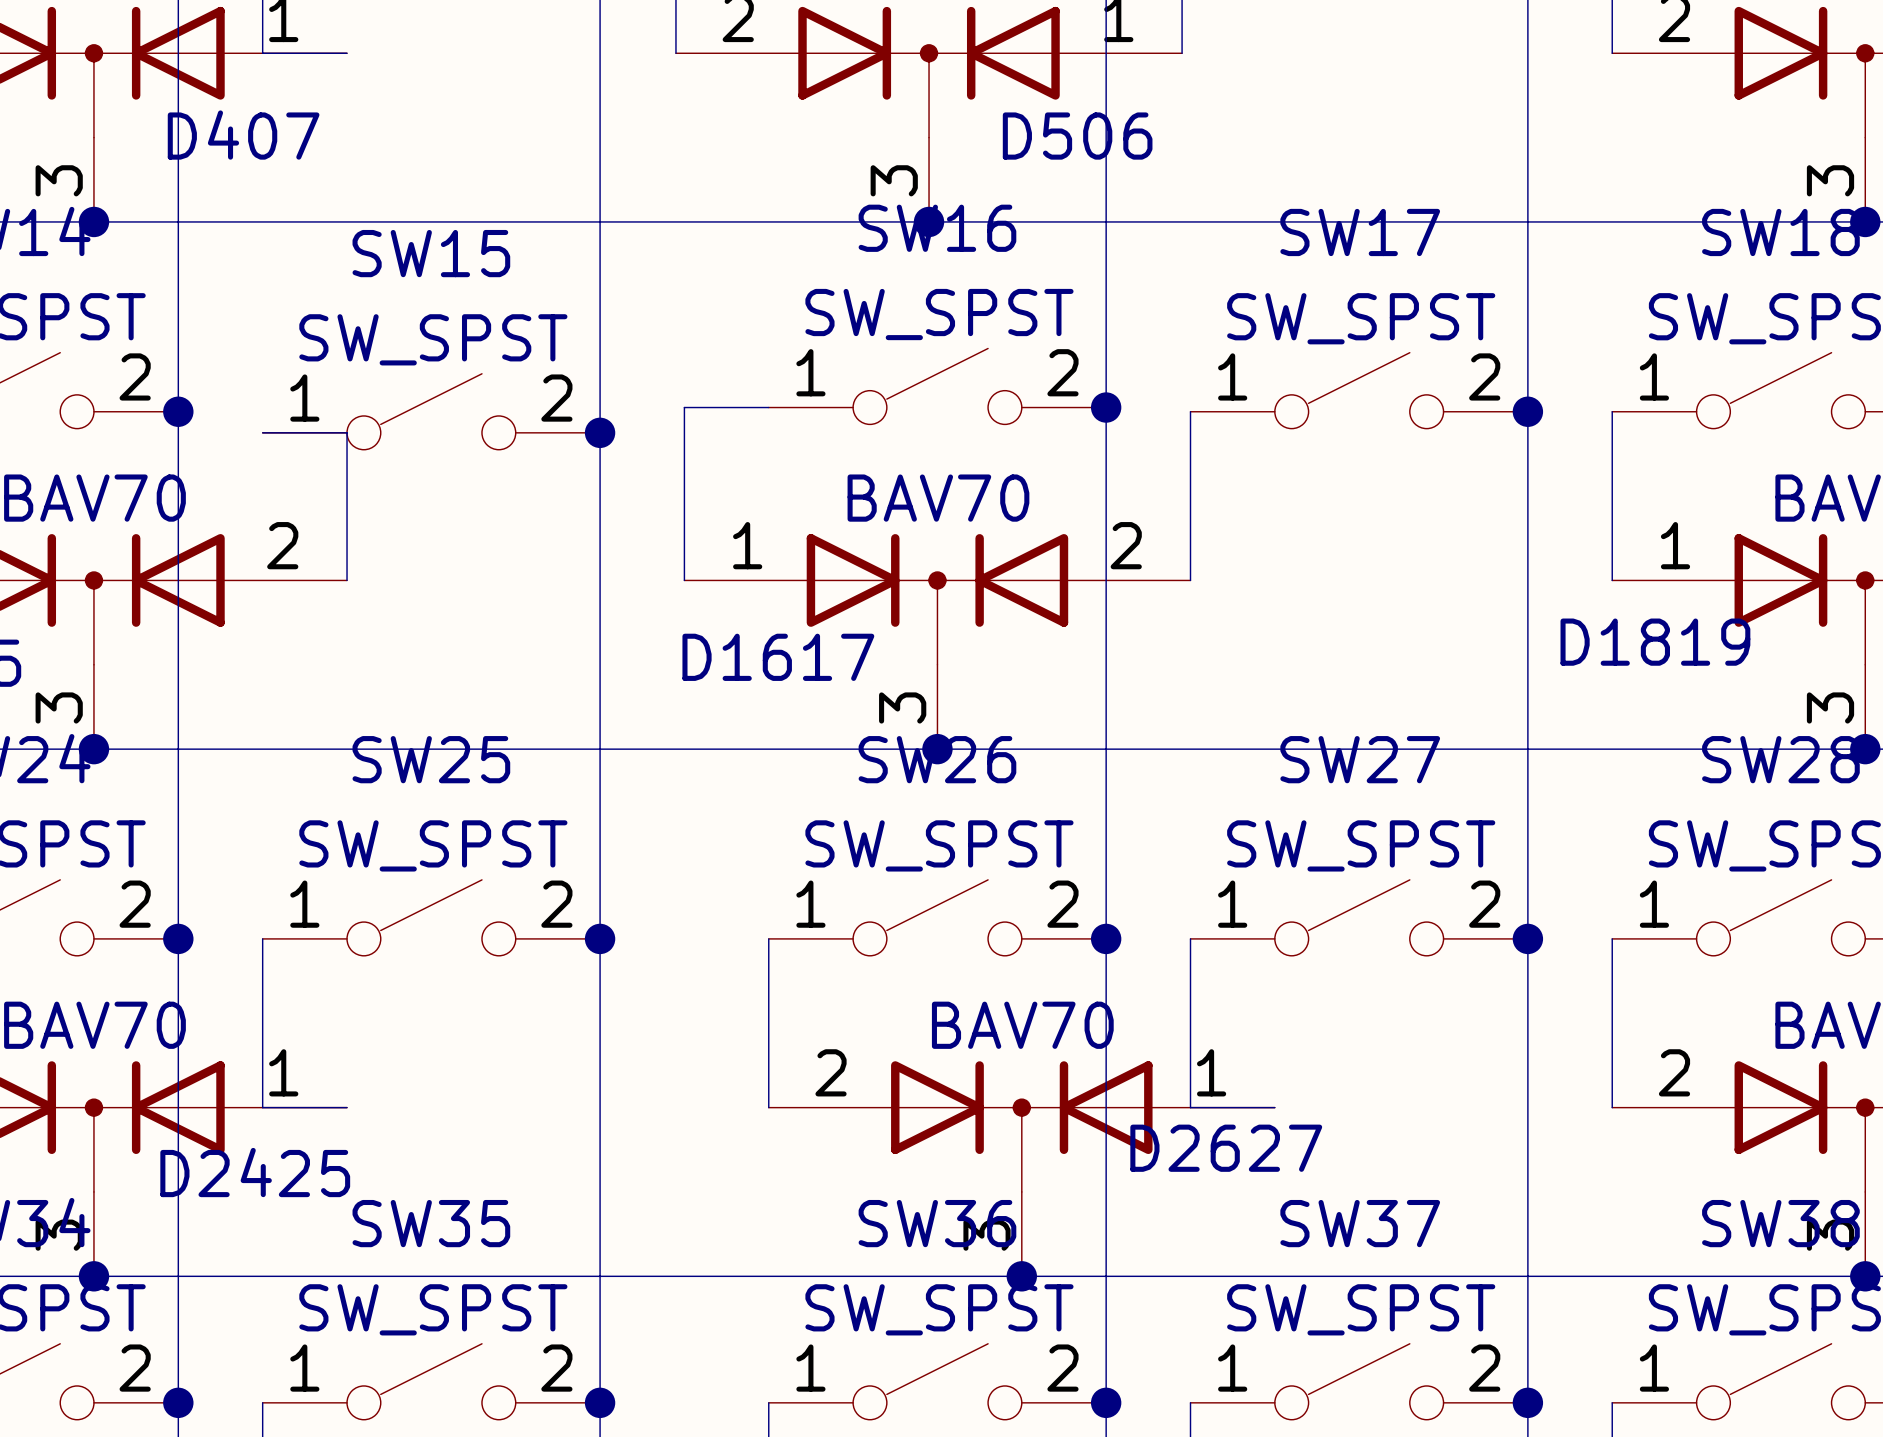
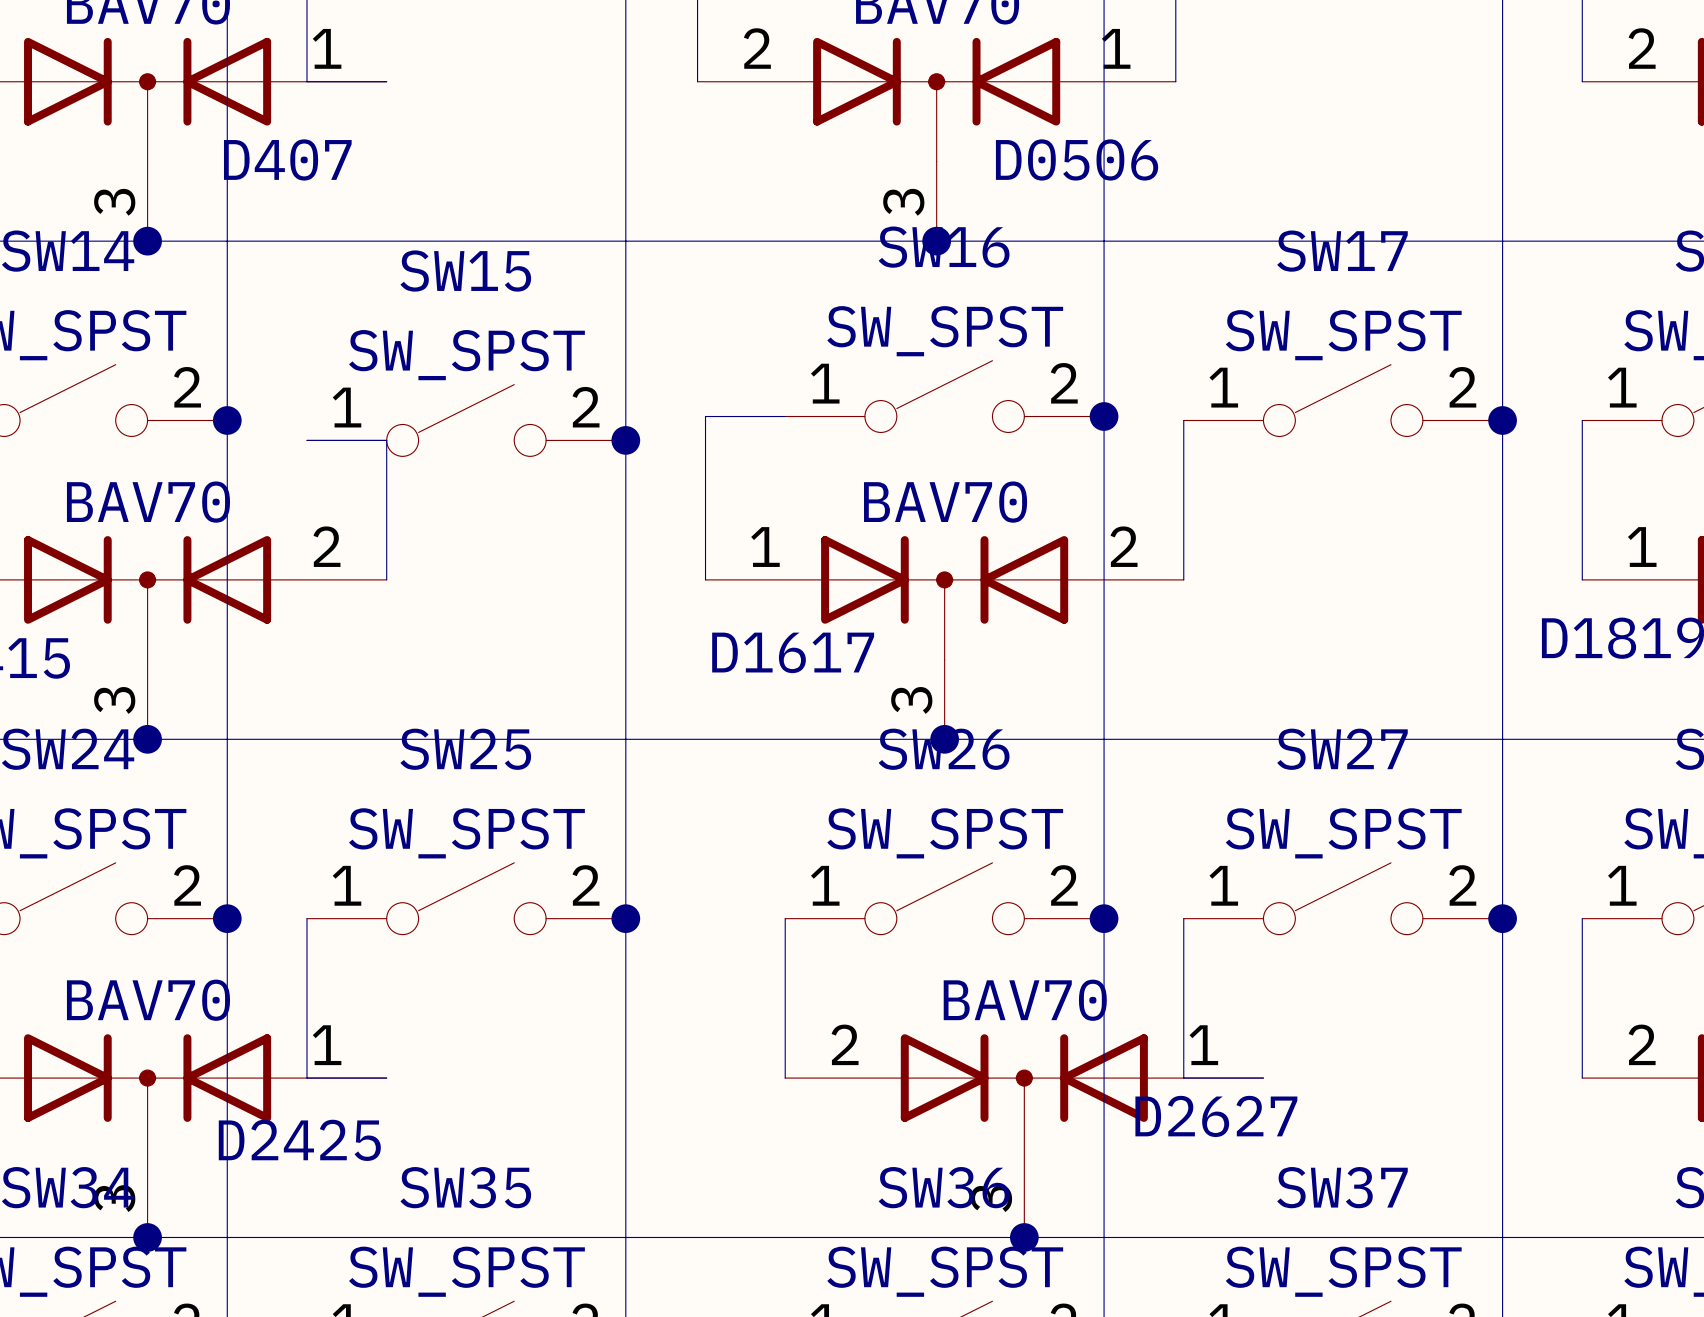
D506 name: D506 (1077, 136) -> D0506 (1077, 159)

